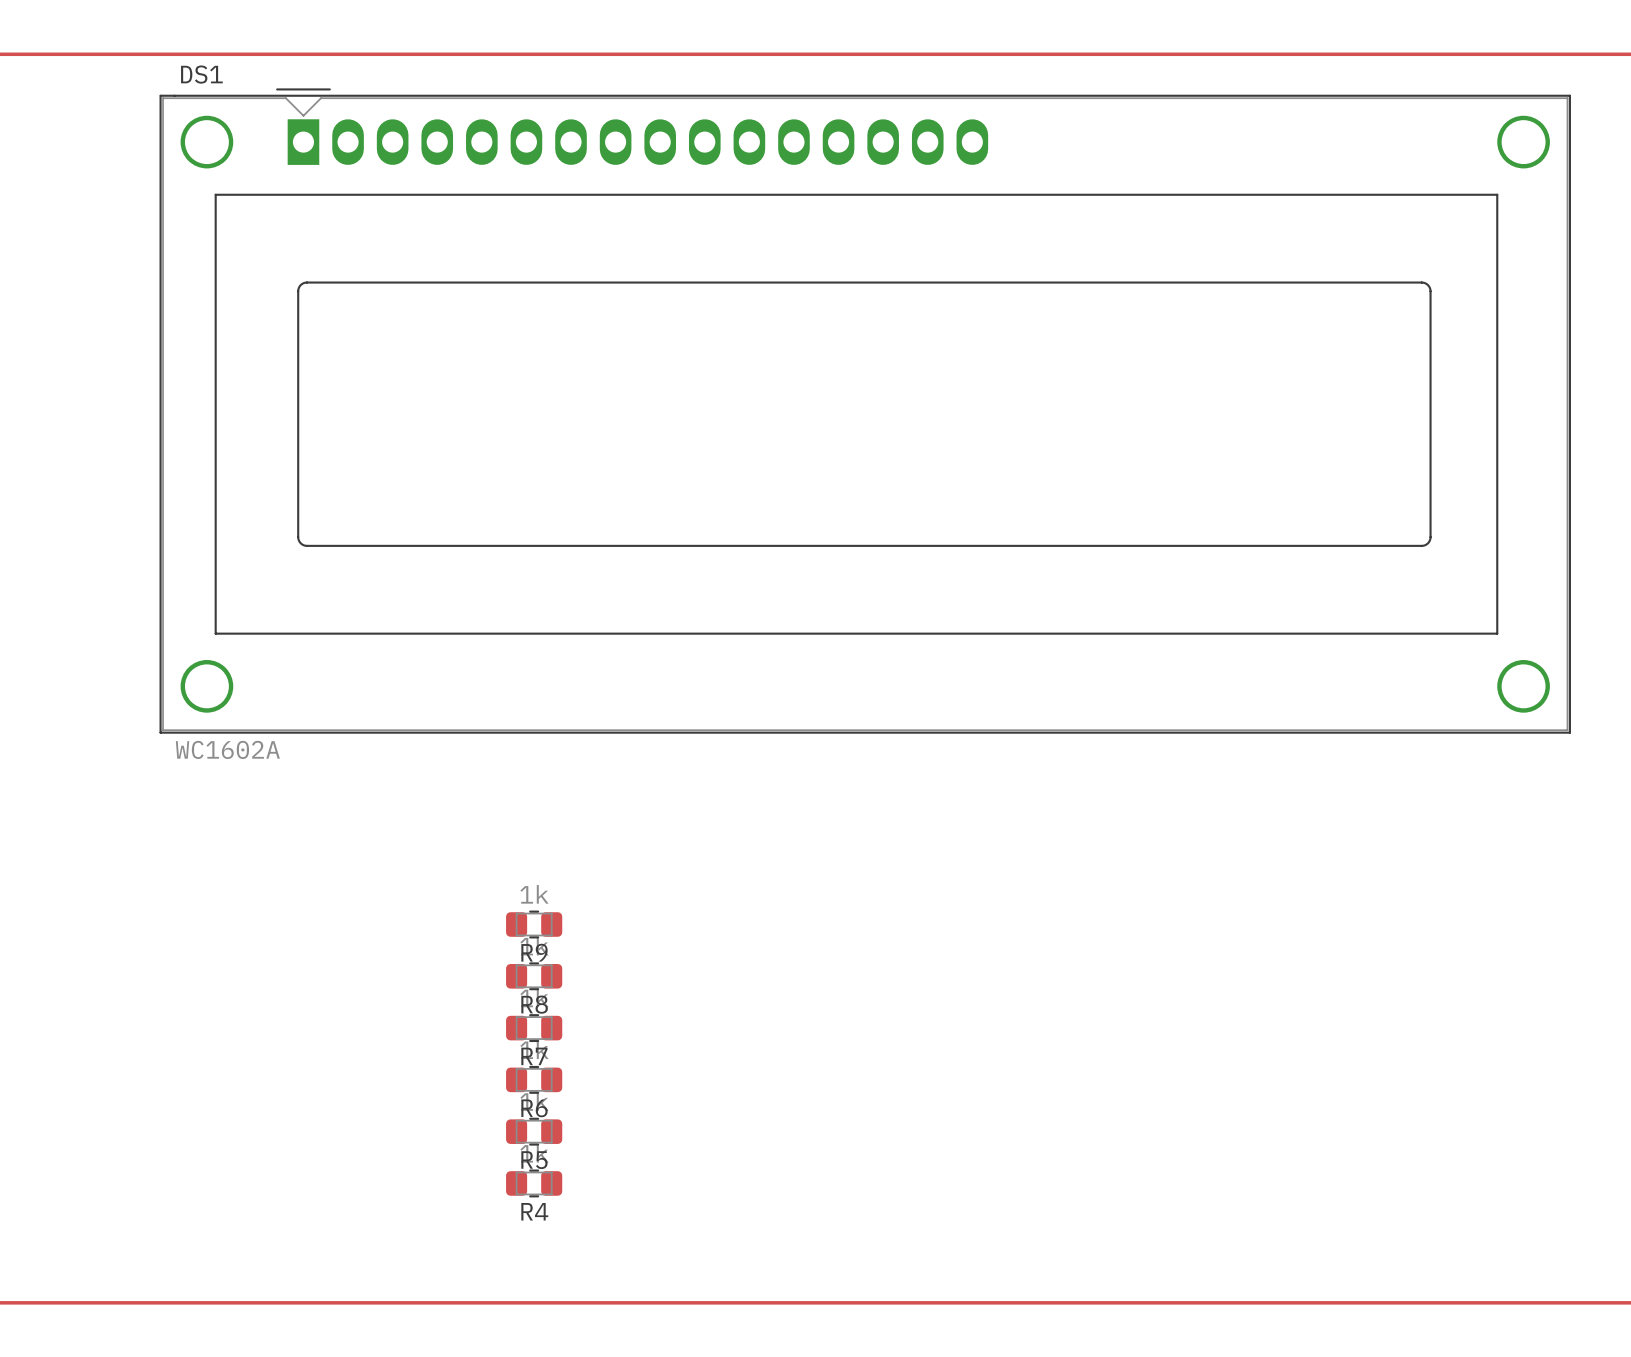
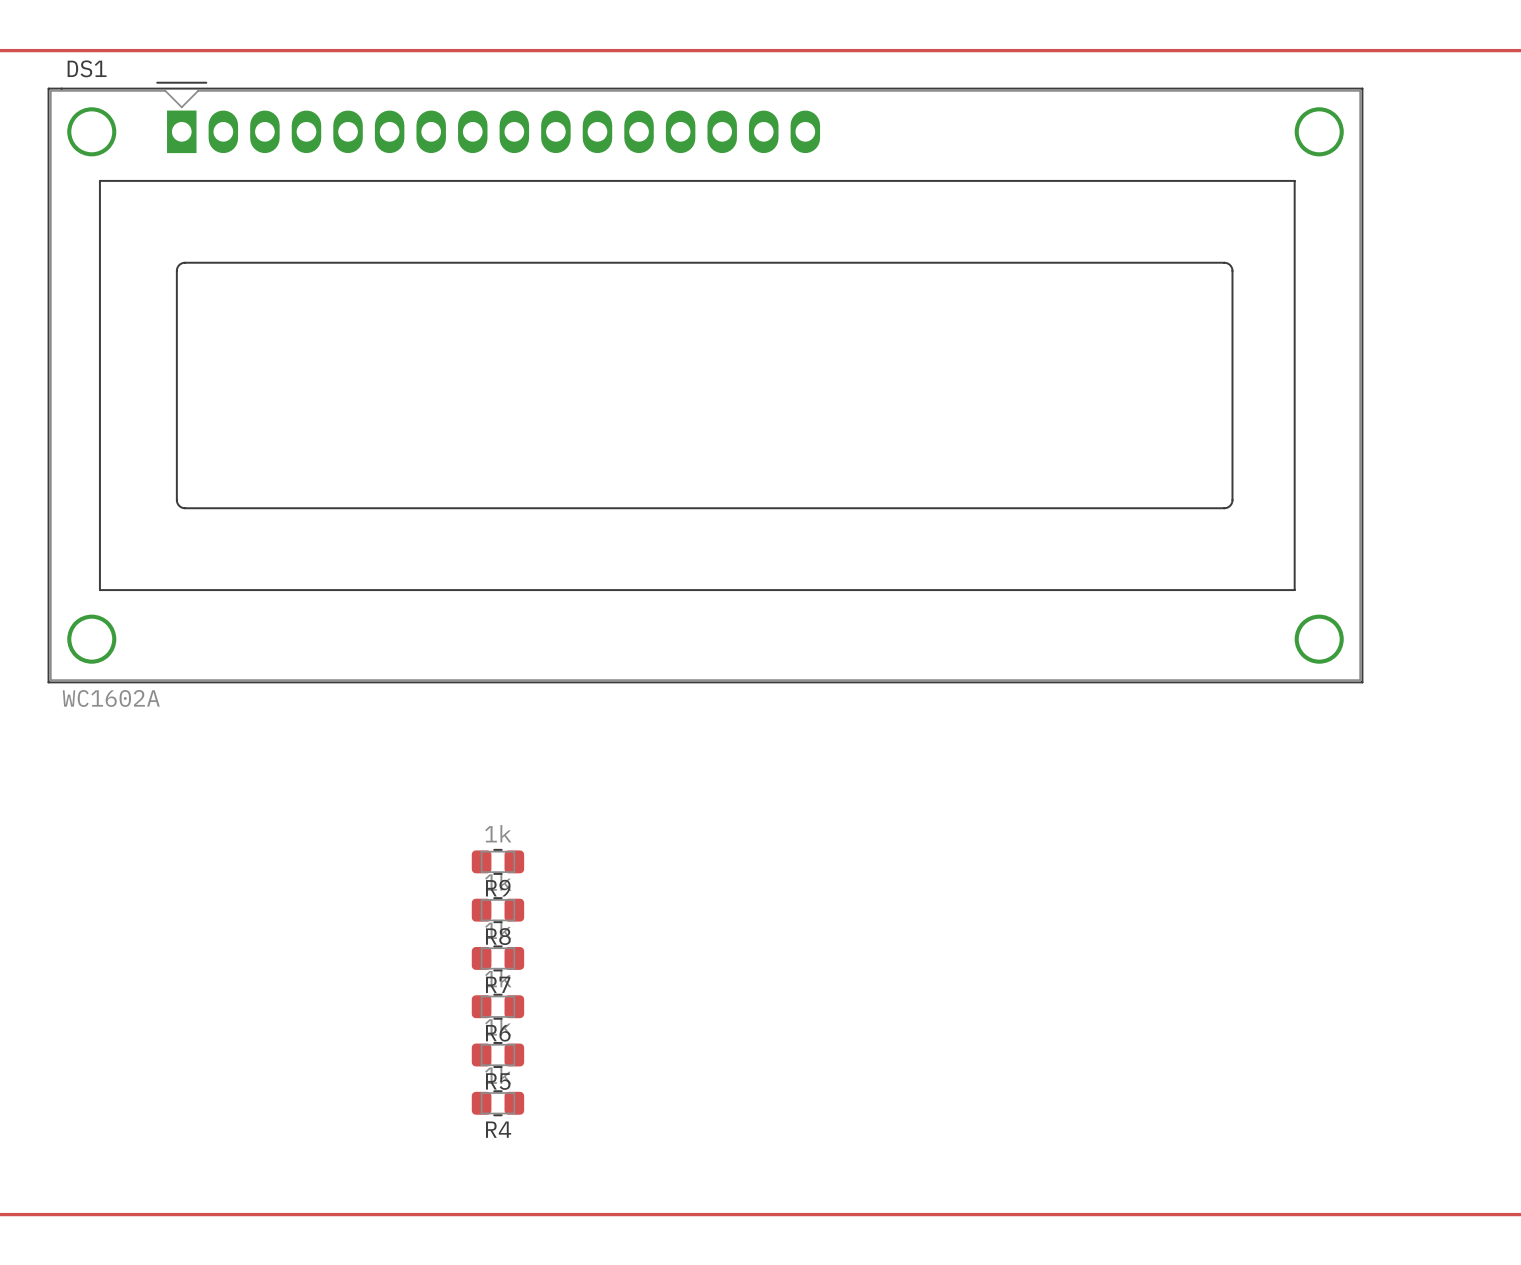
DS1 footprint: [159, 88, 1571, 734] -> [47, 81, 1364, 684]

